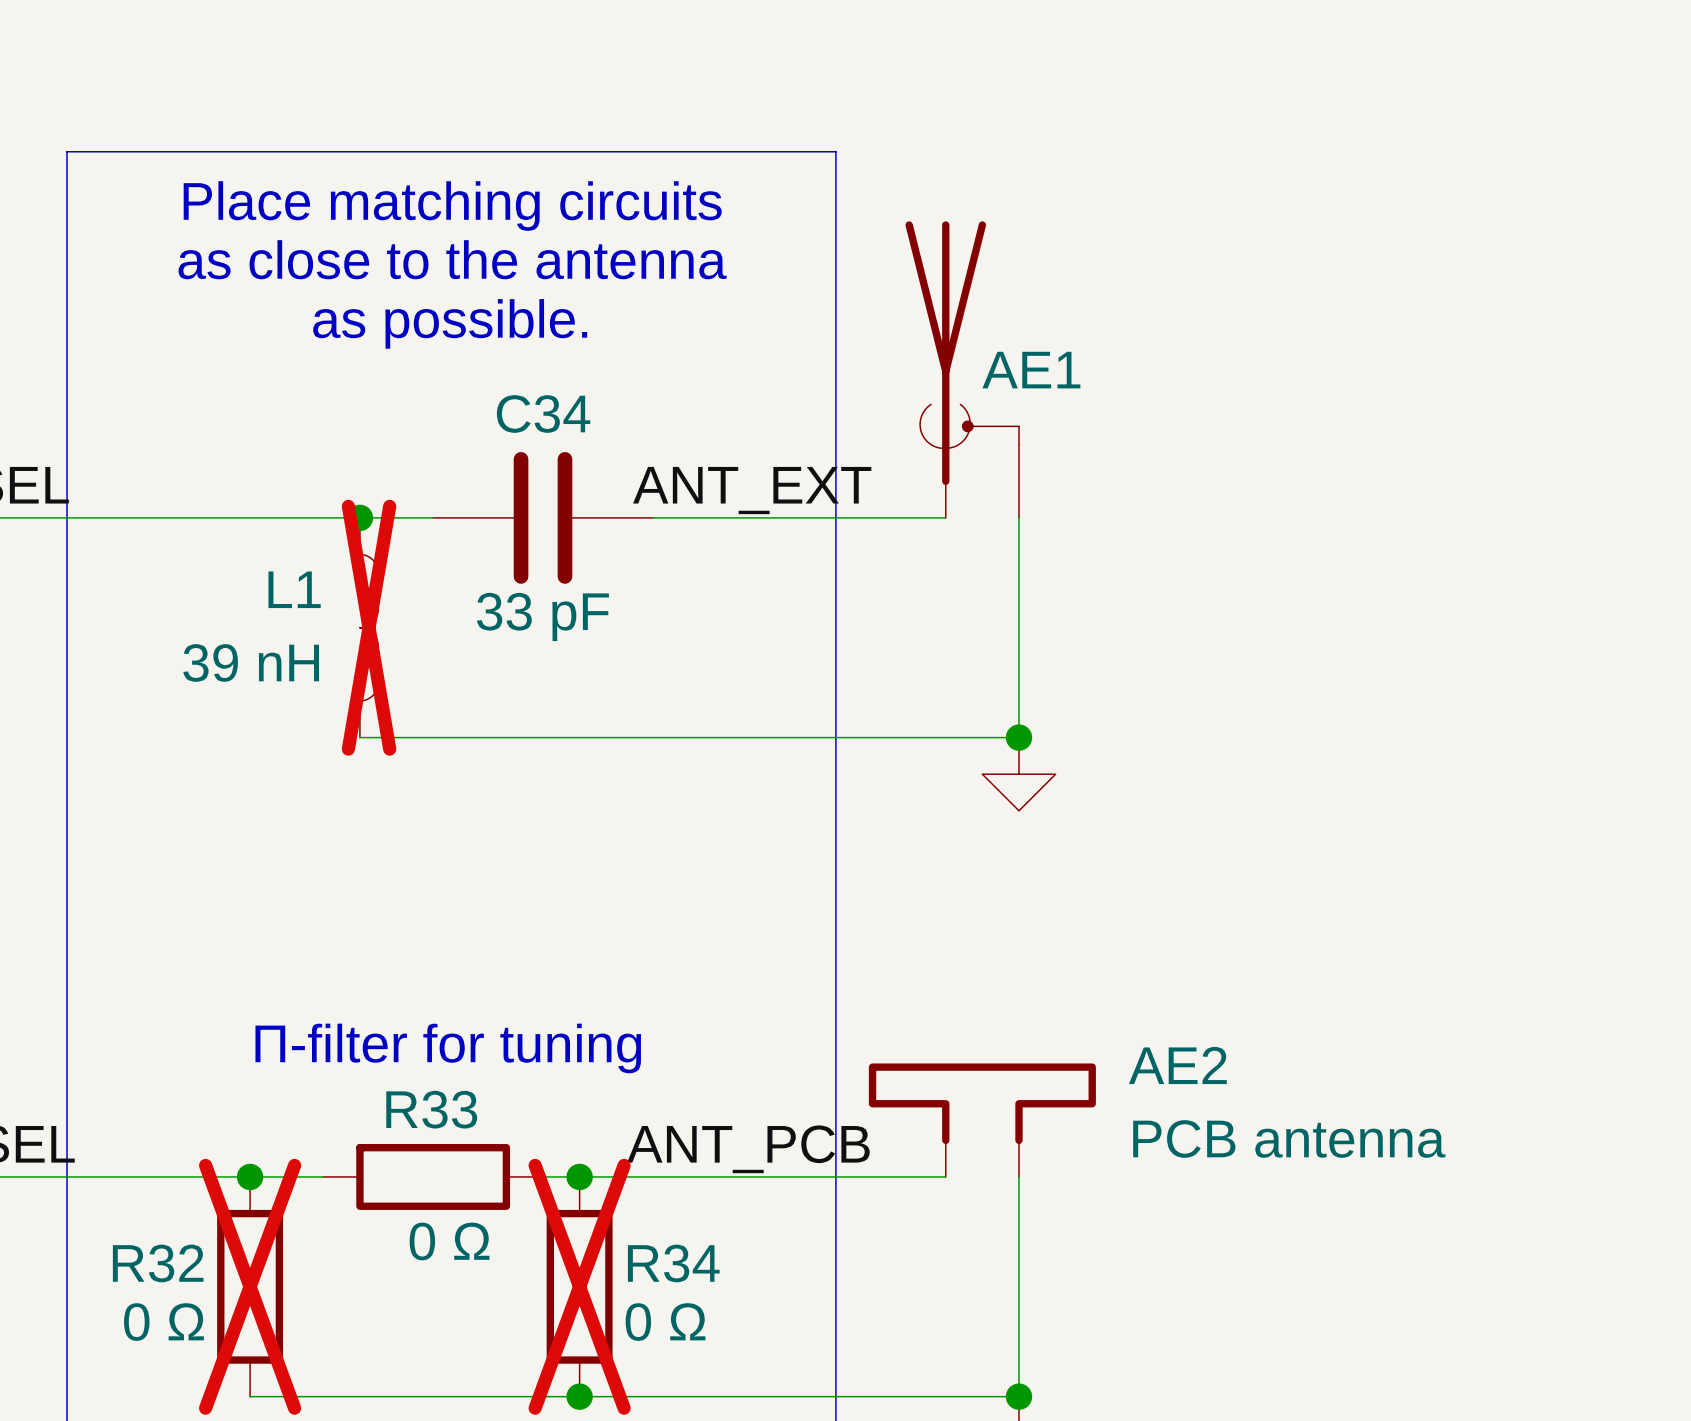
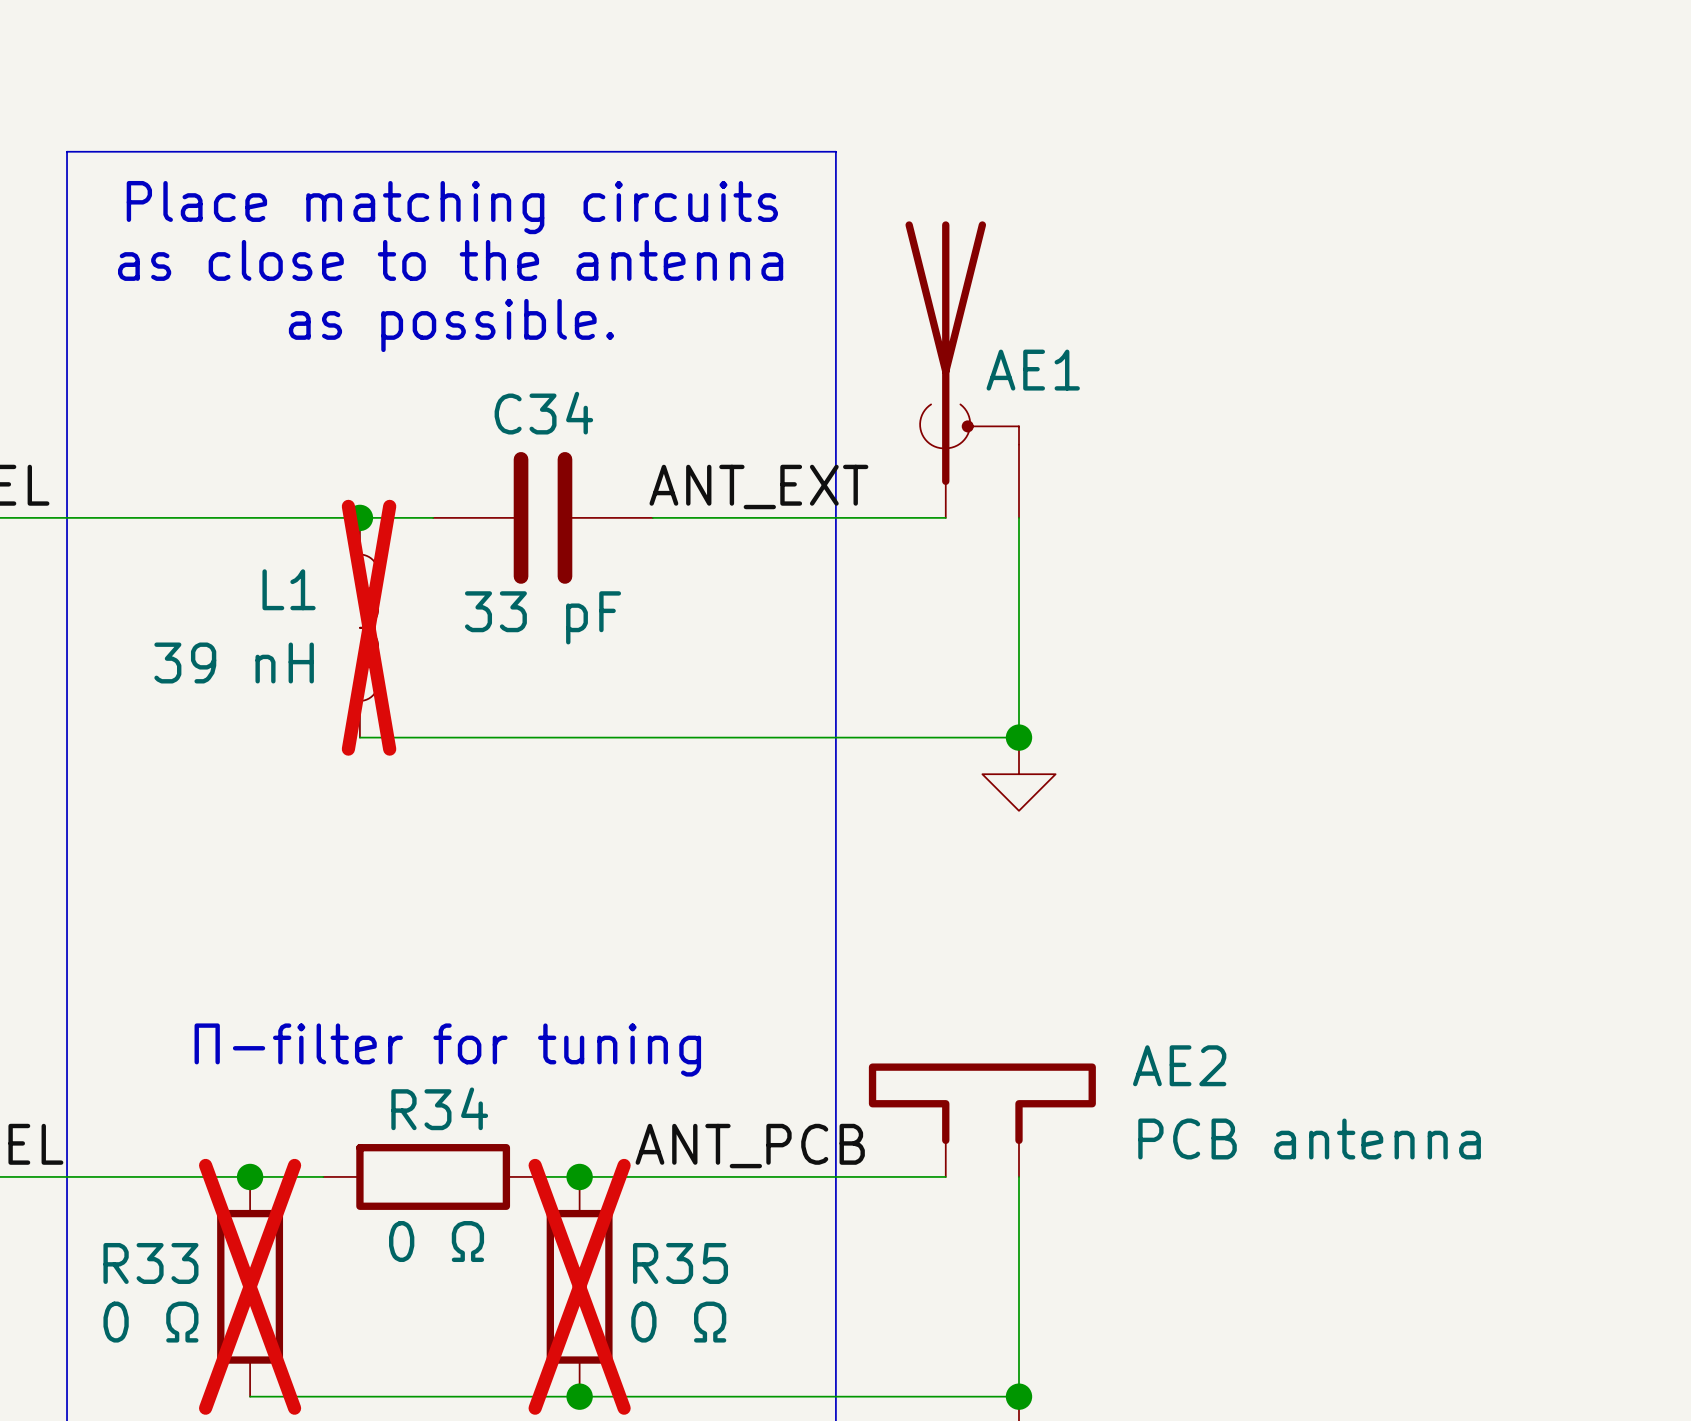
R33 name: R33 (431, 1109) -> R34 (439, 1108)
R32 name: R32 (158, 1263) -> R33 (150, 1263)
R34 name: R34 (673, 1263) -> R35 (680, 1263)

